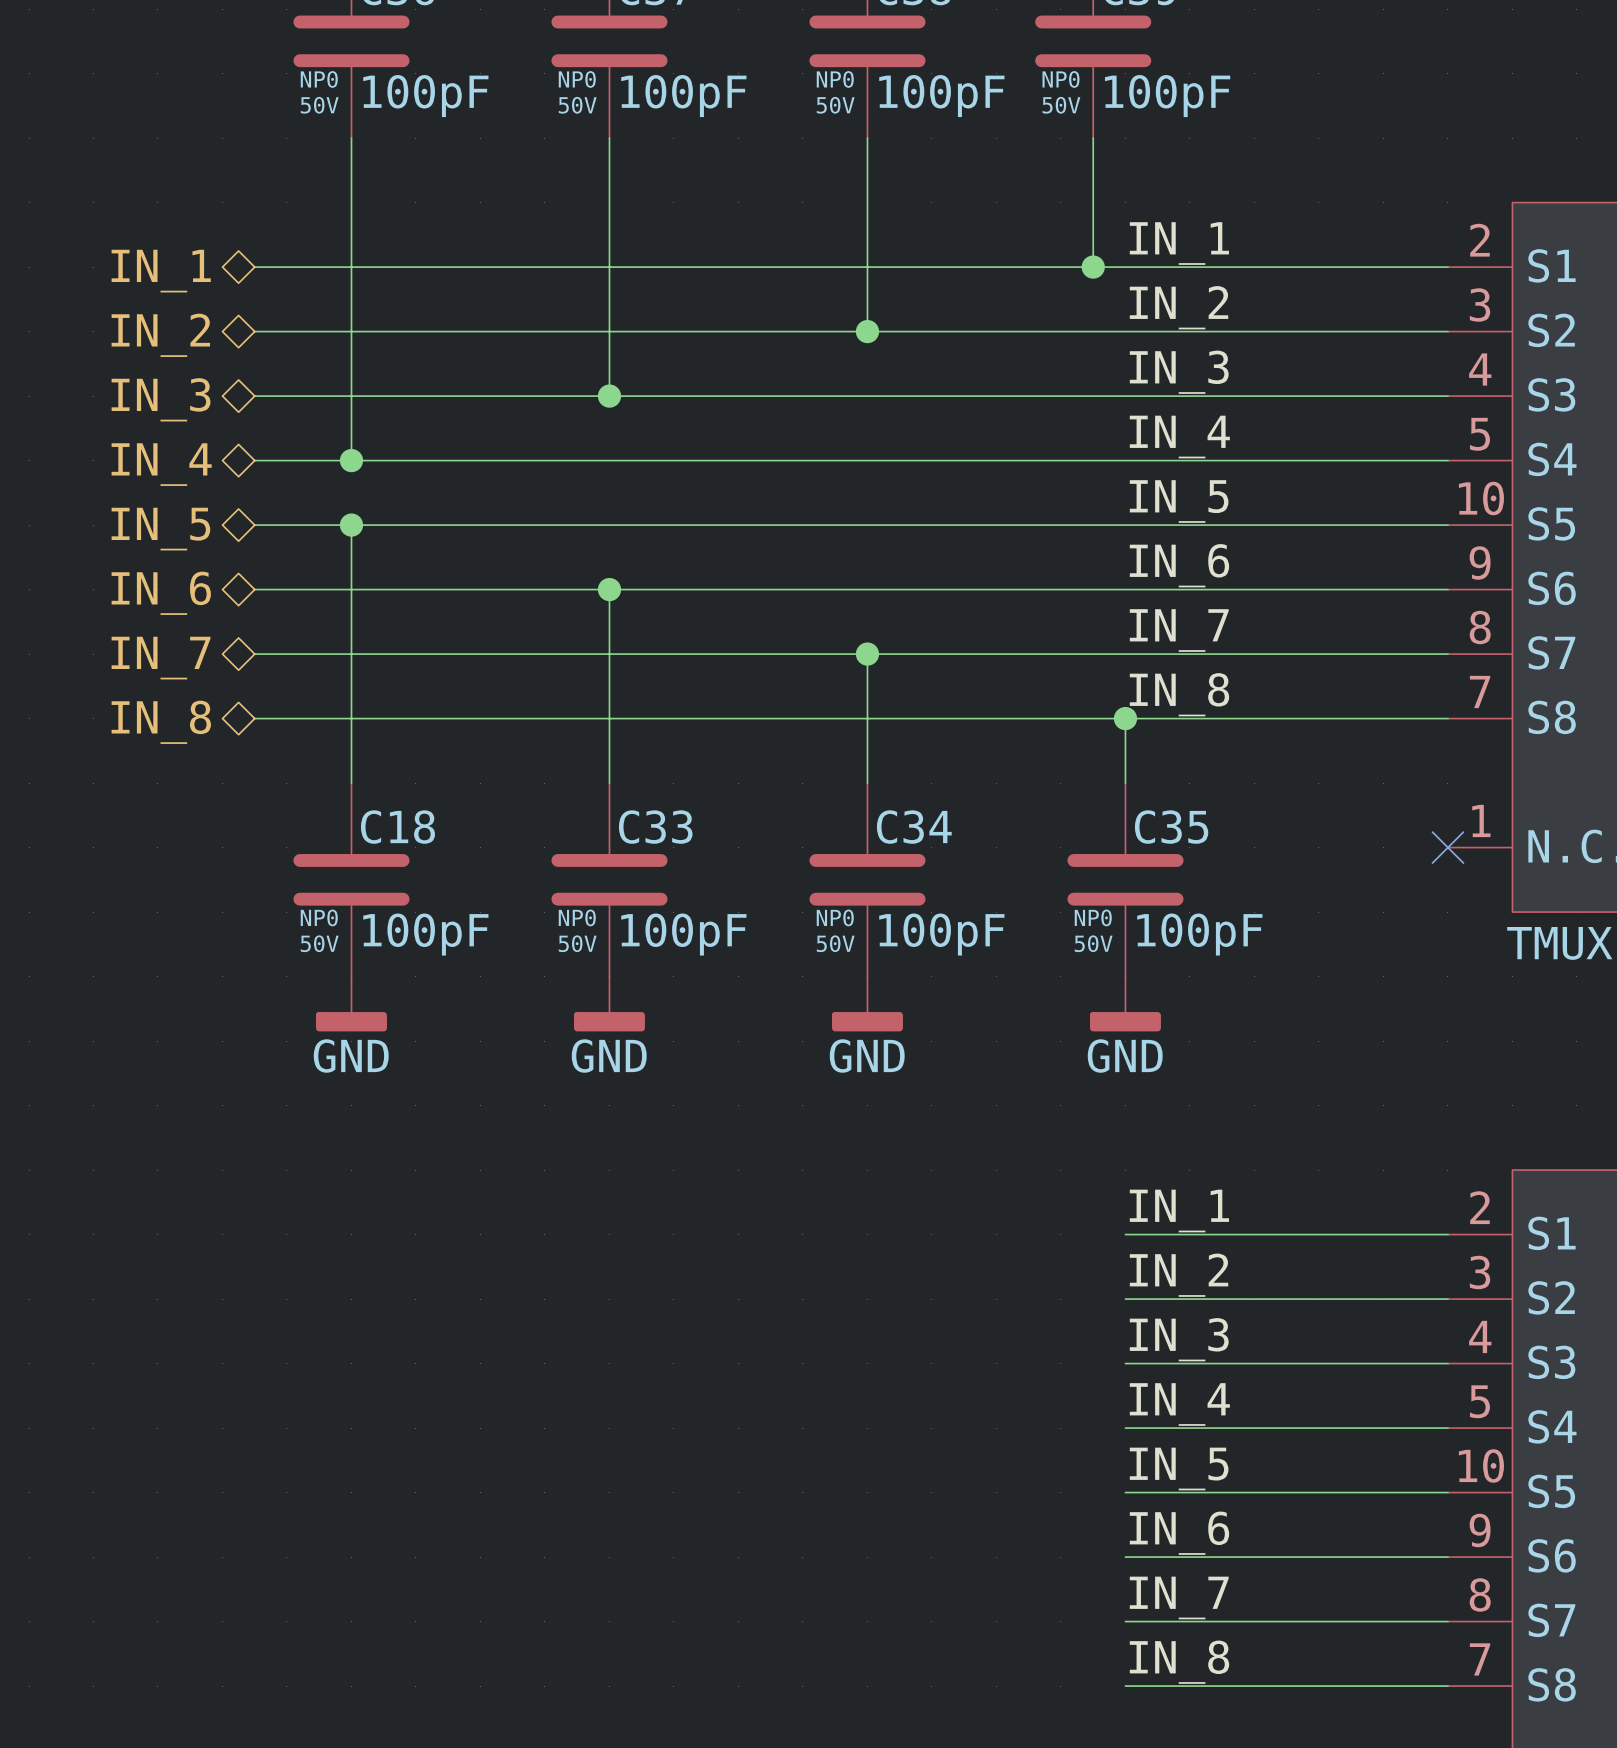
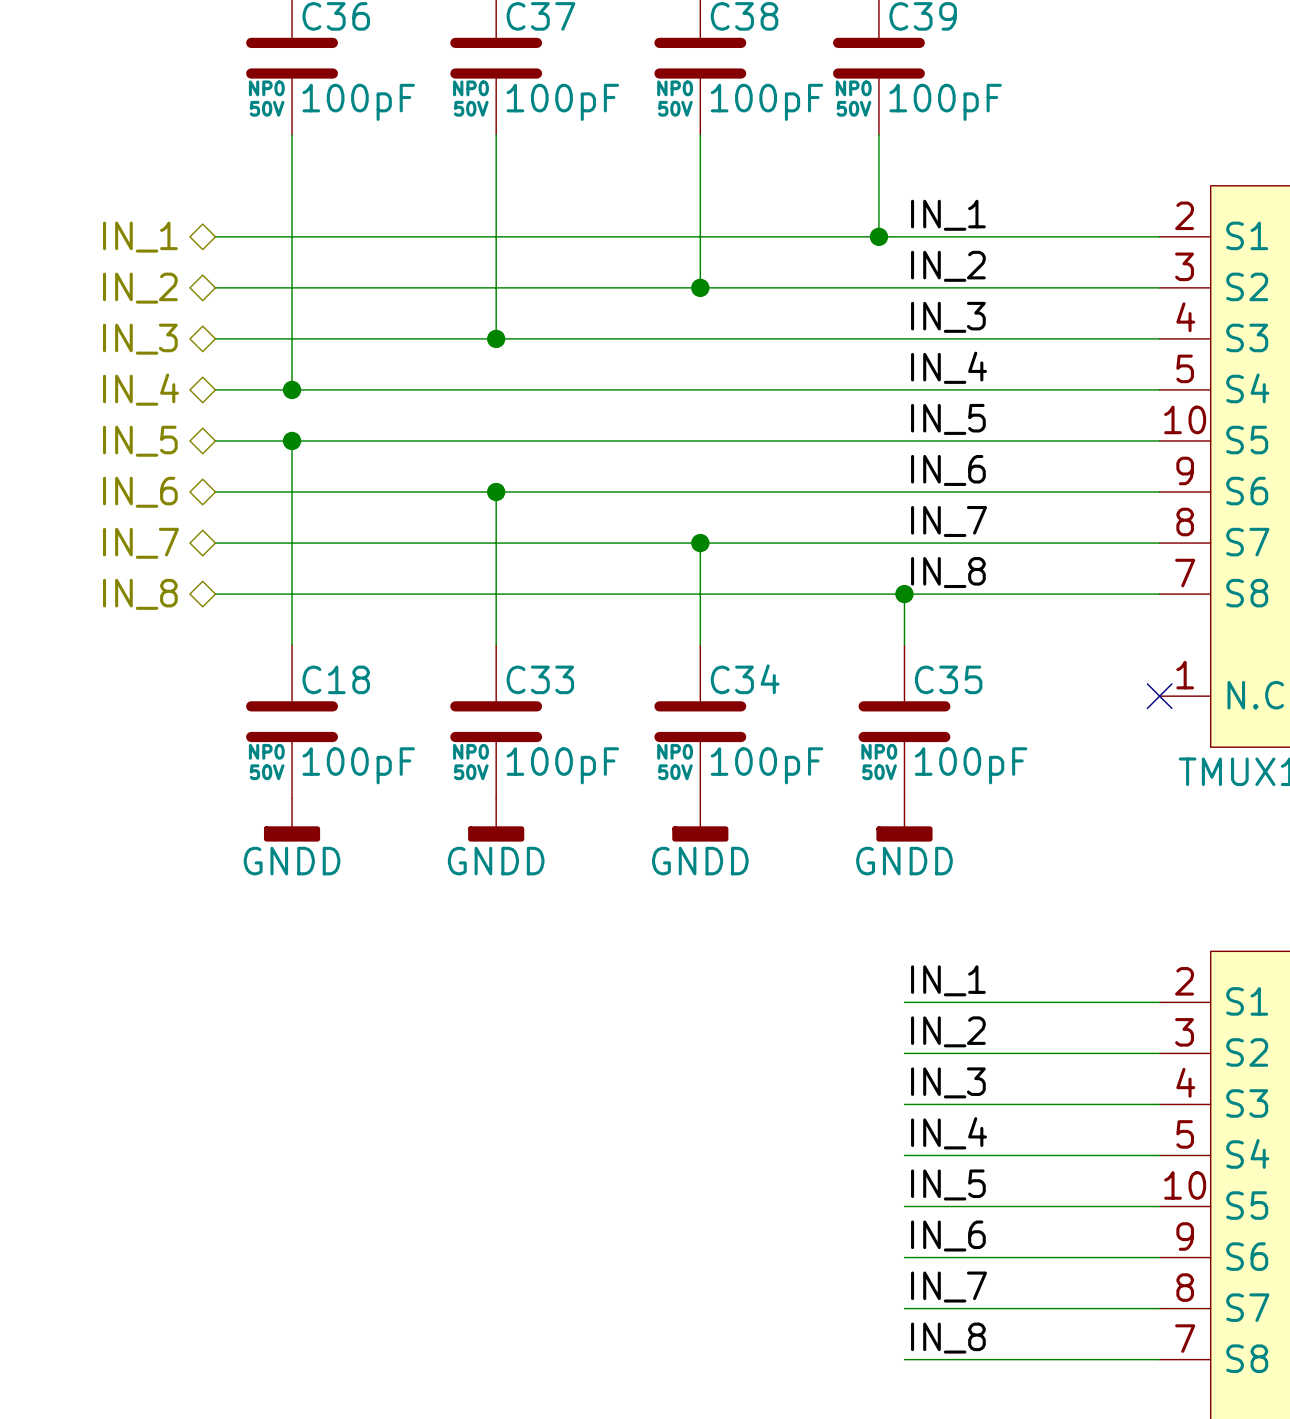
power symbol: GND (351, 1003) -> GNDD (292, 819)
power symbol: GND (609, 1003) -> GNDD (496, 819)
power symbol: GND (867, 1003) -> GNDD (700, 819)
power symbol: GND (1125, 1003) -> GNDD (904, 819)

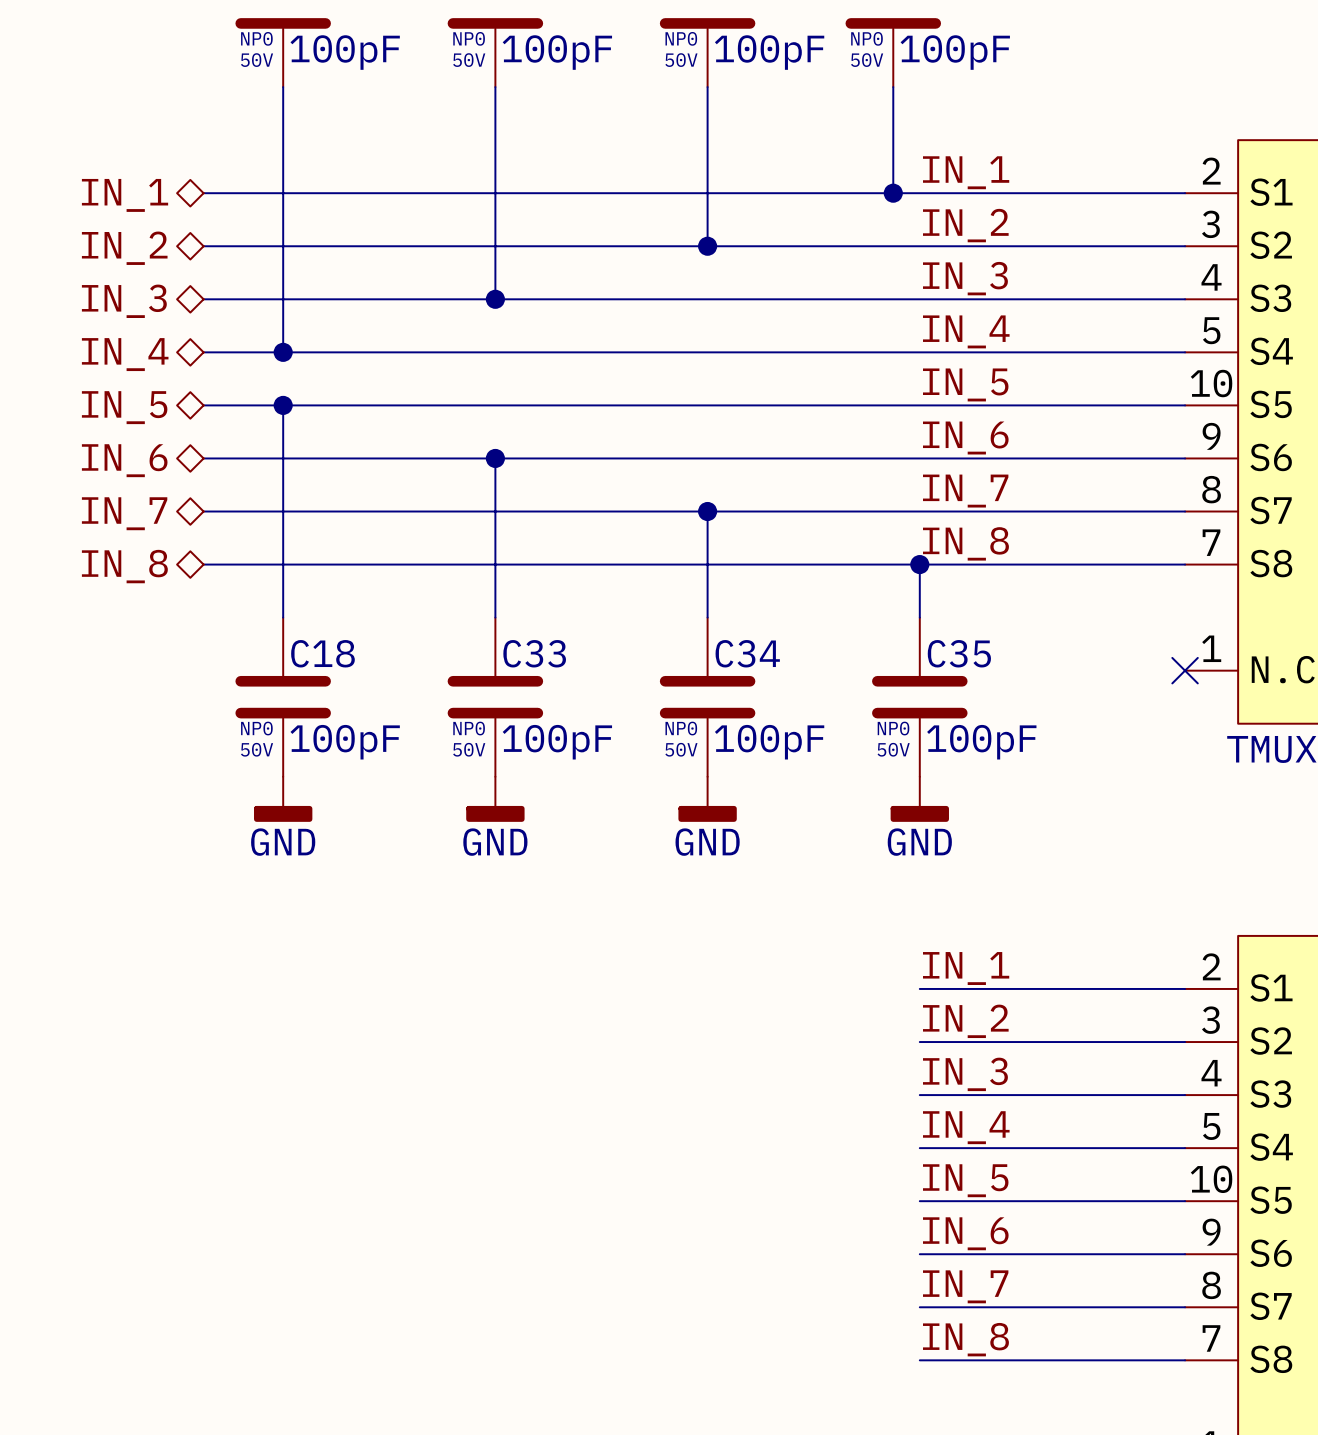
power symbol: GNDD (292, 819) -> GND (283, 799)
power symbol: GNDD (496, 819) -> GND (495, 799)
power symbol: GNDD (700, 819) -> GND (707, 799)
power symbol: GNDD (904, 819) -> GND (919, 799)

